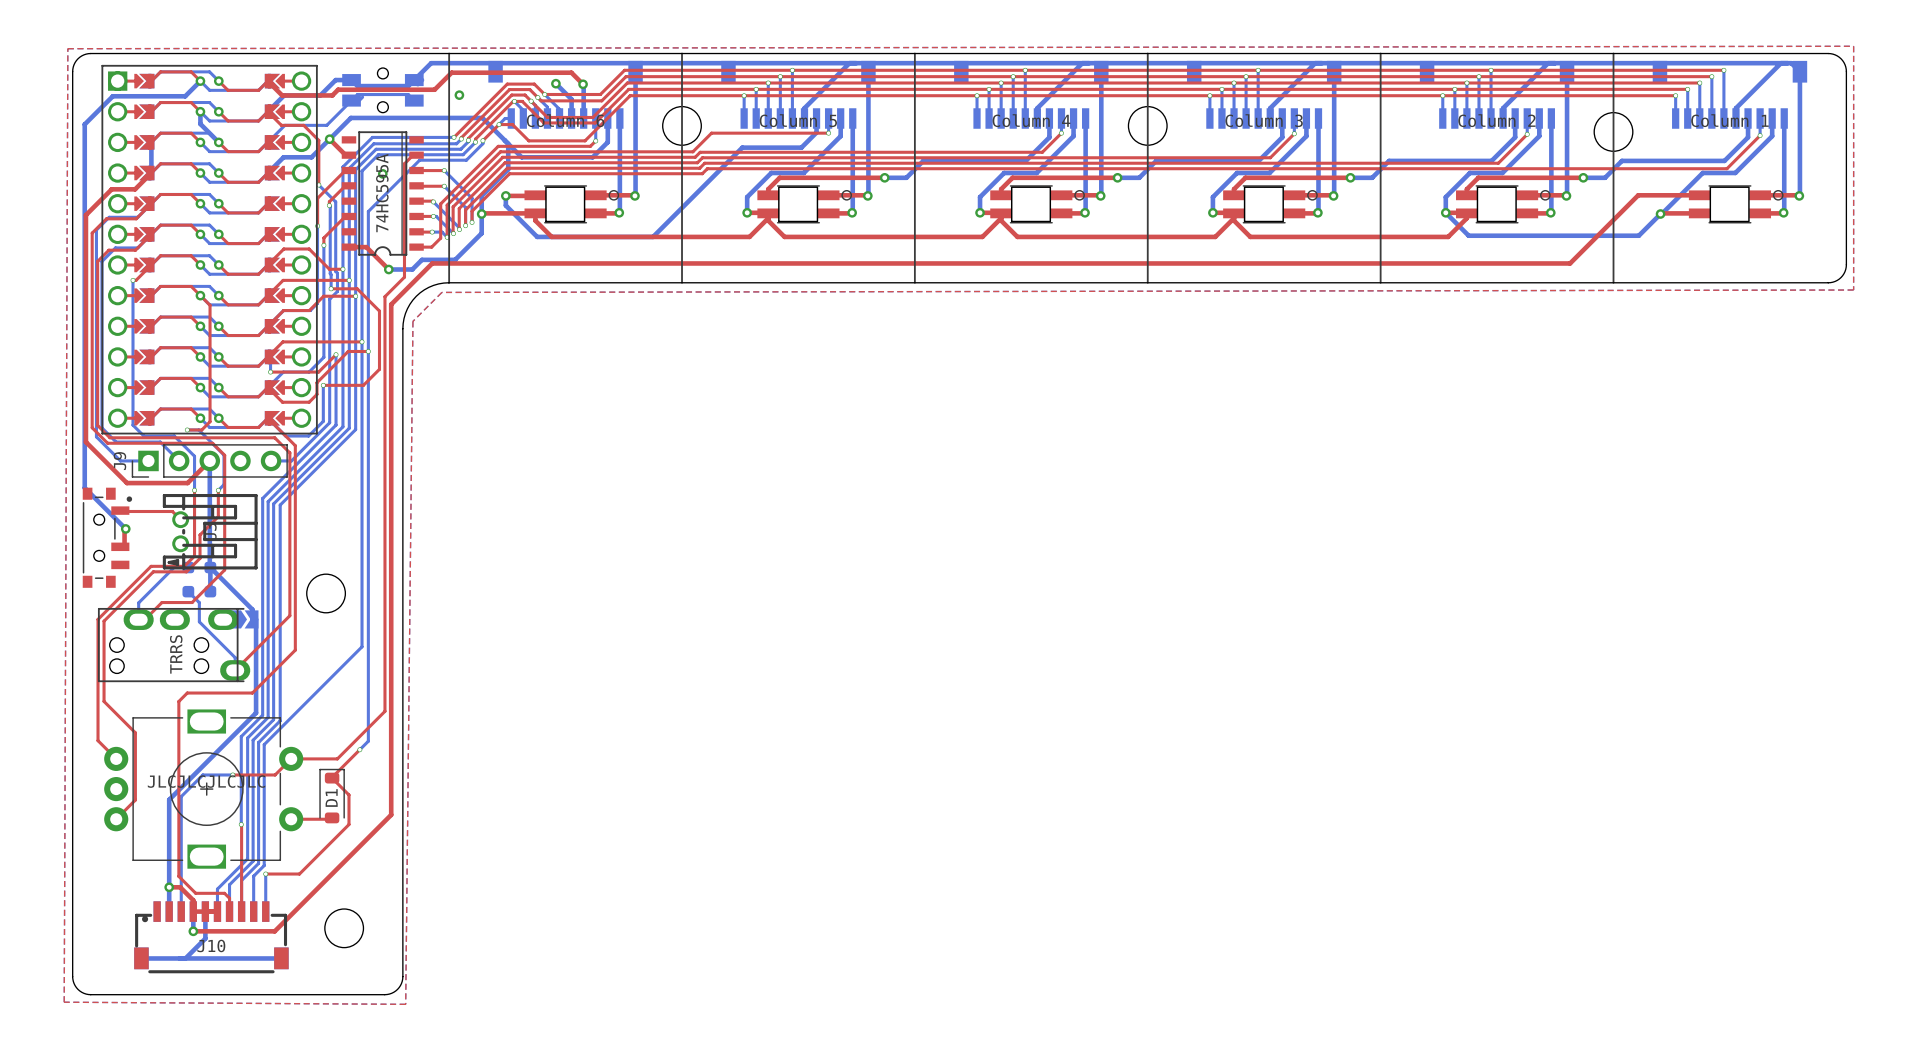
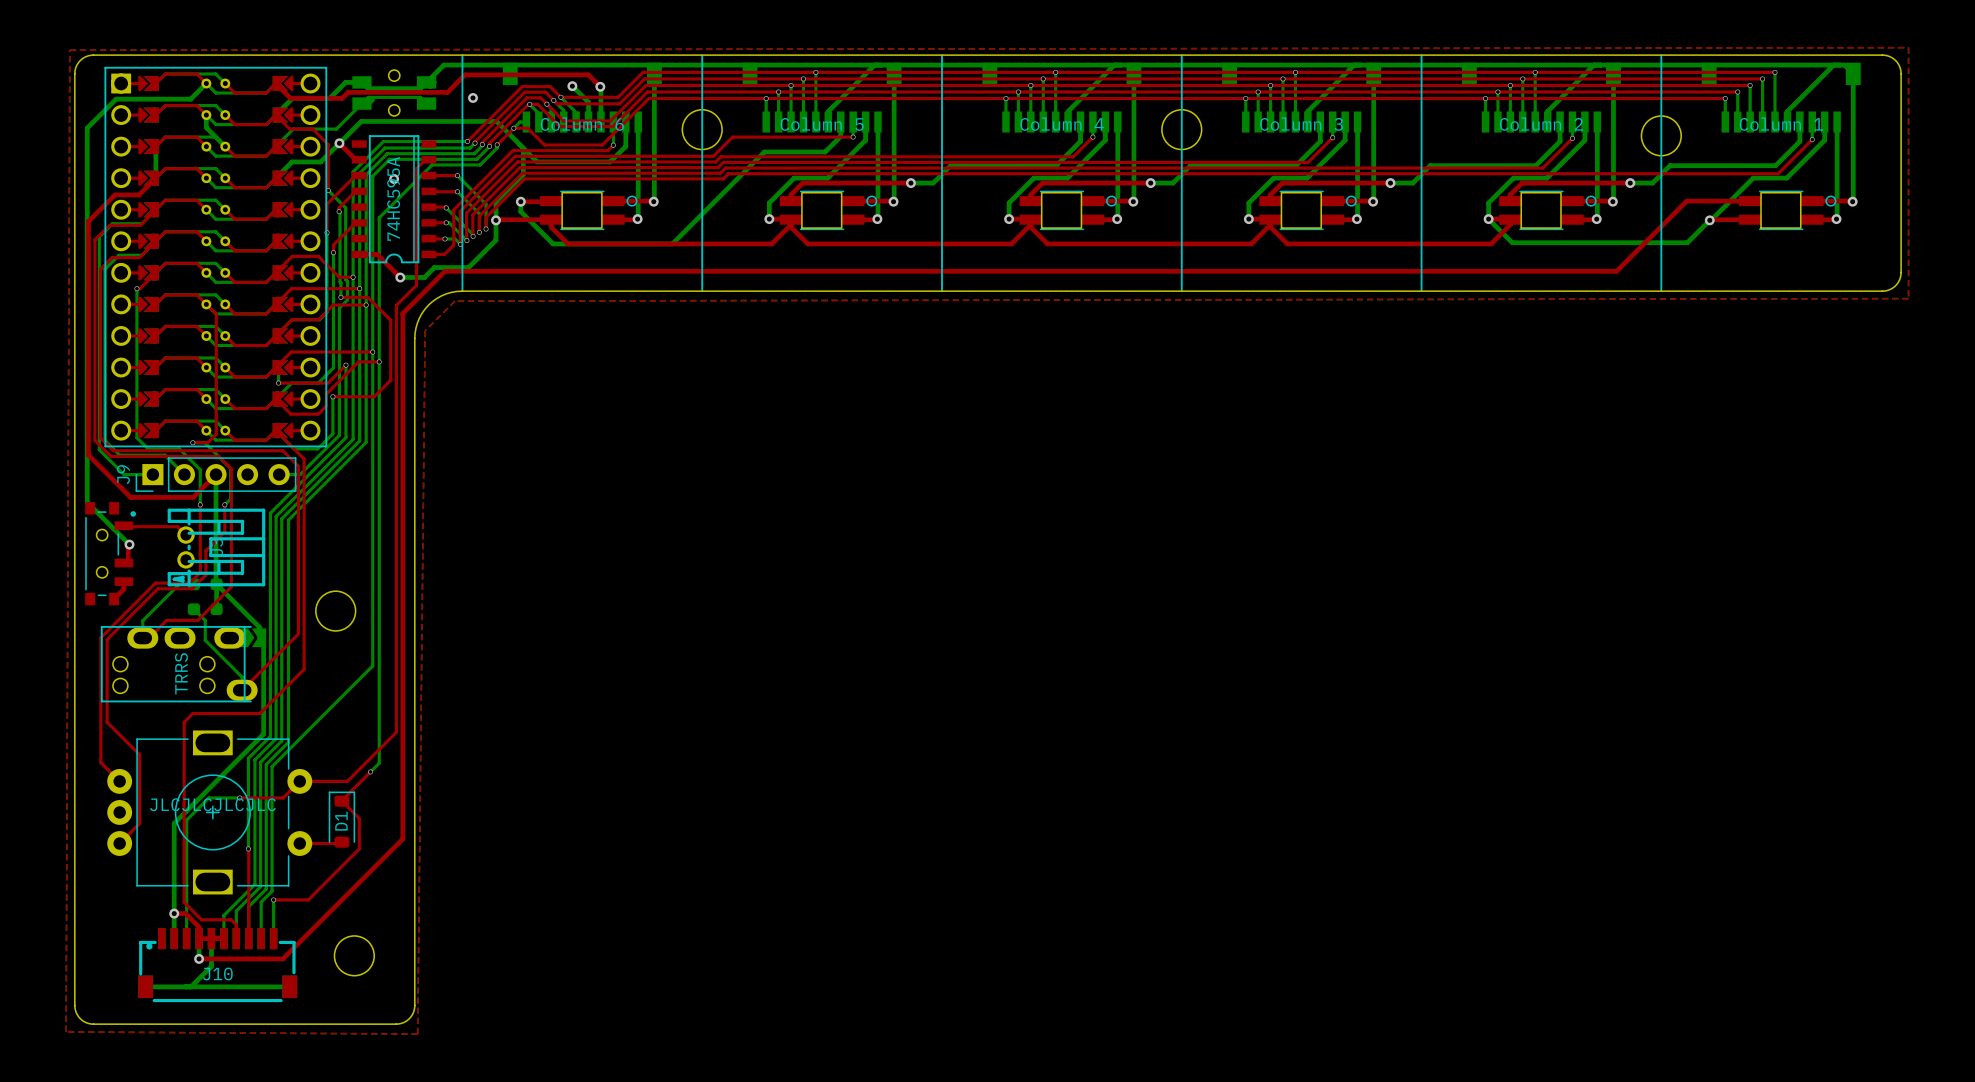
top track: none -> (123, 581) (123, 589) (114, 599)

